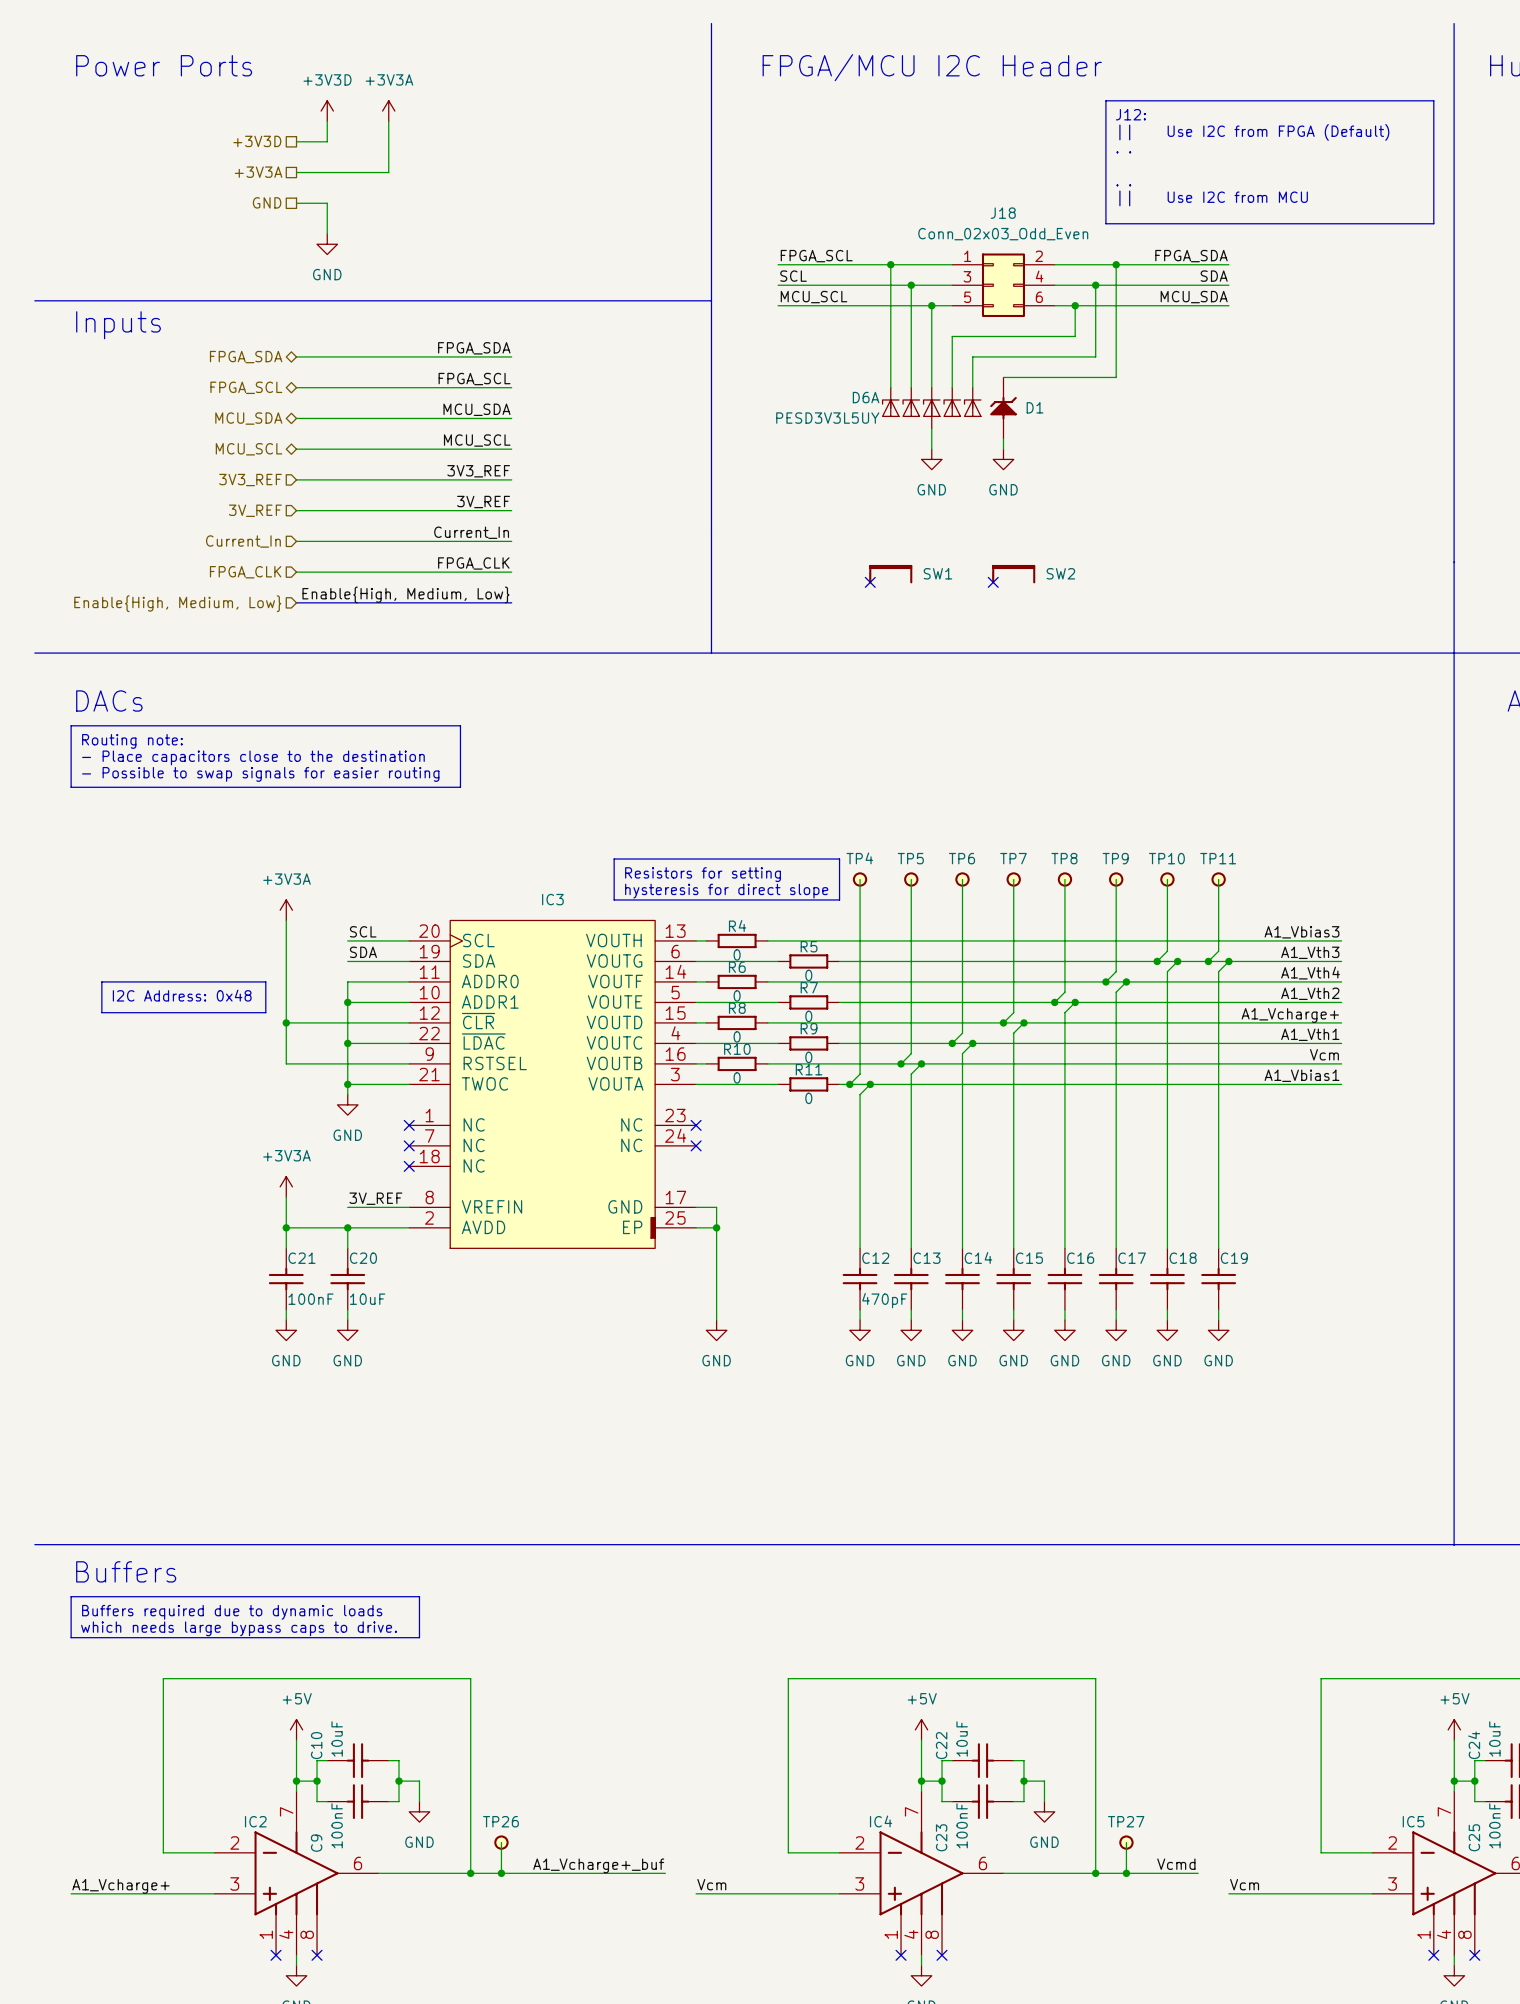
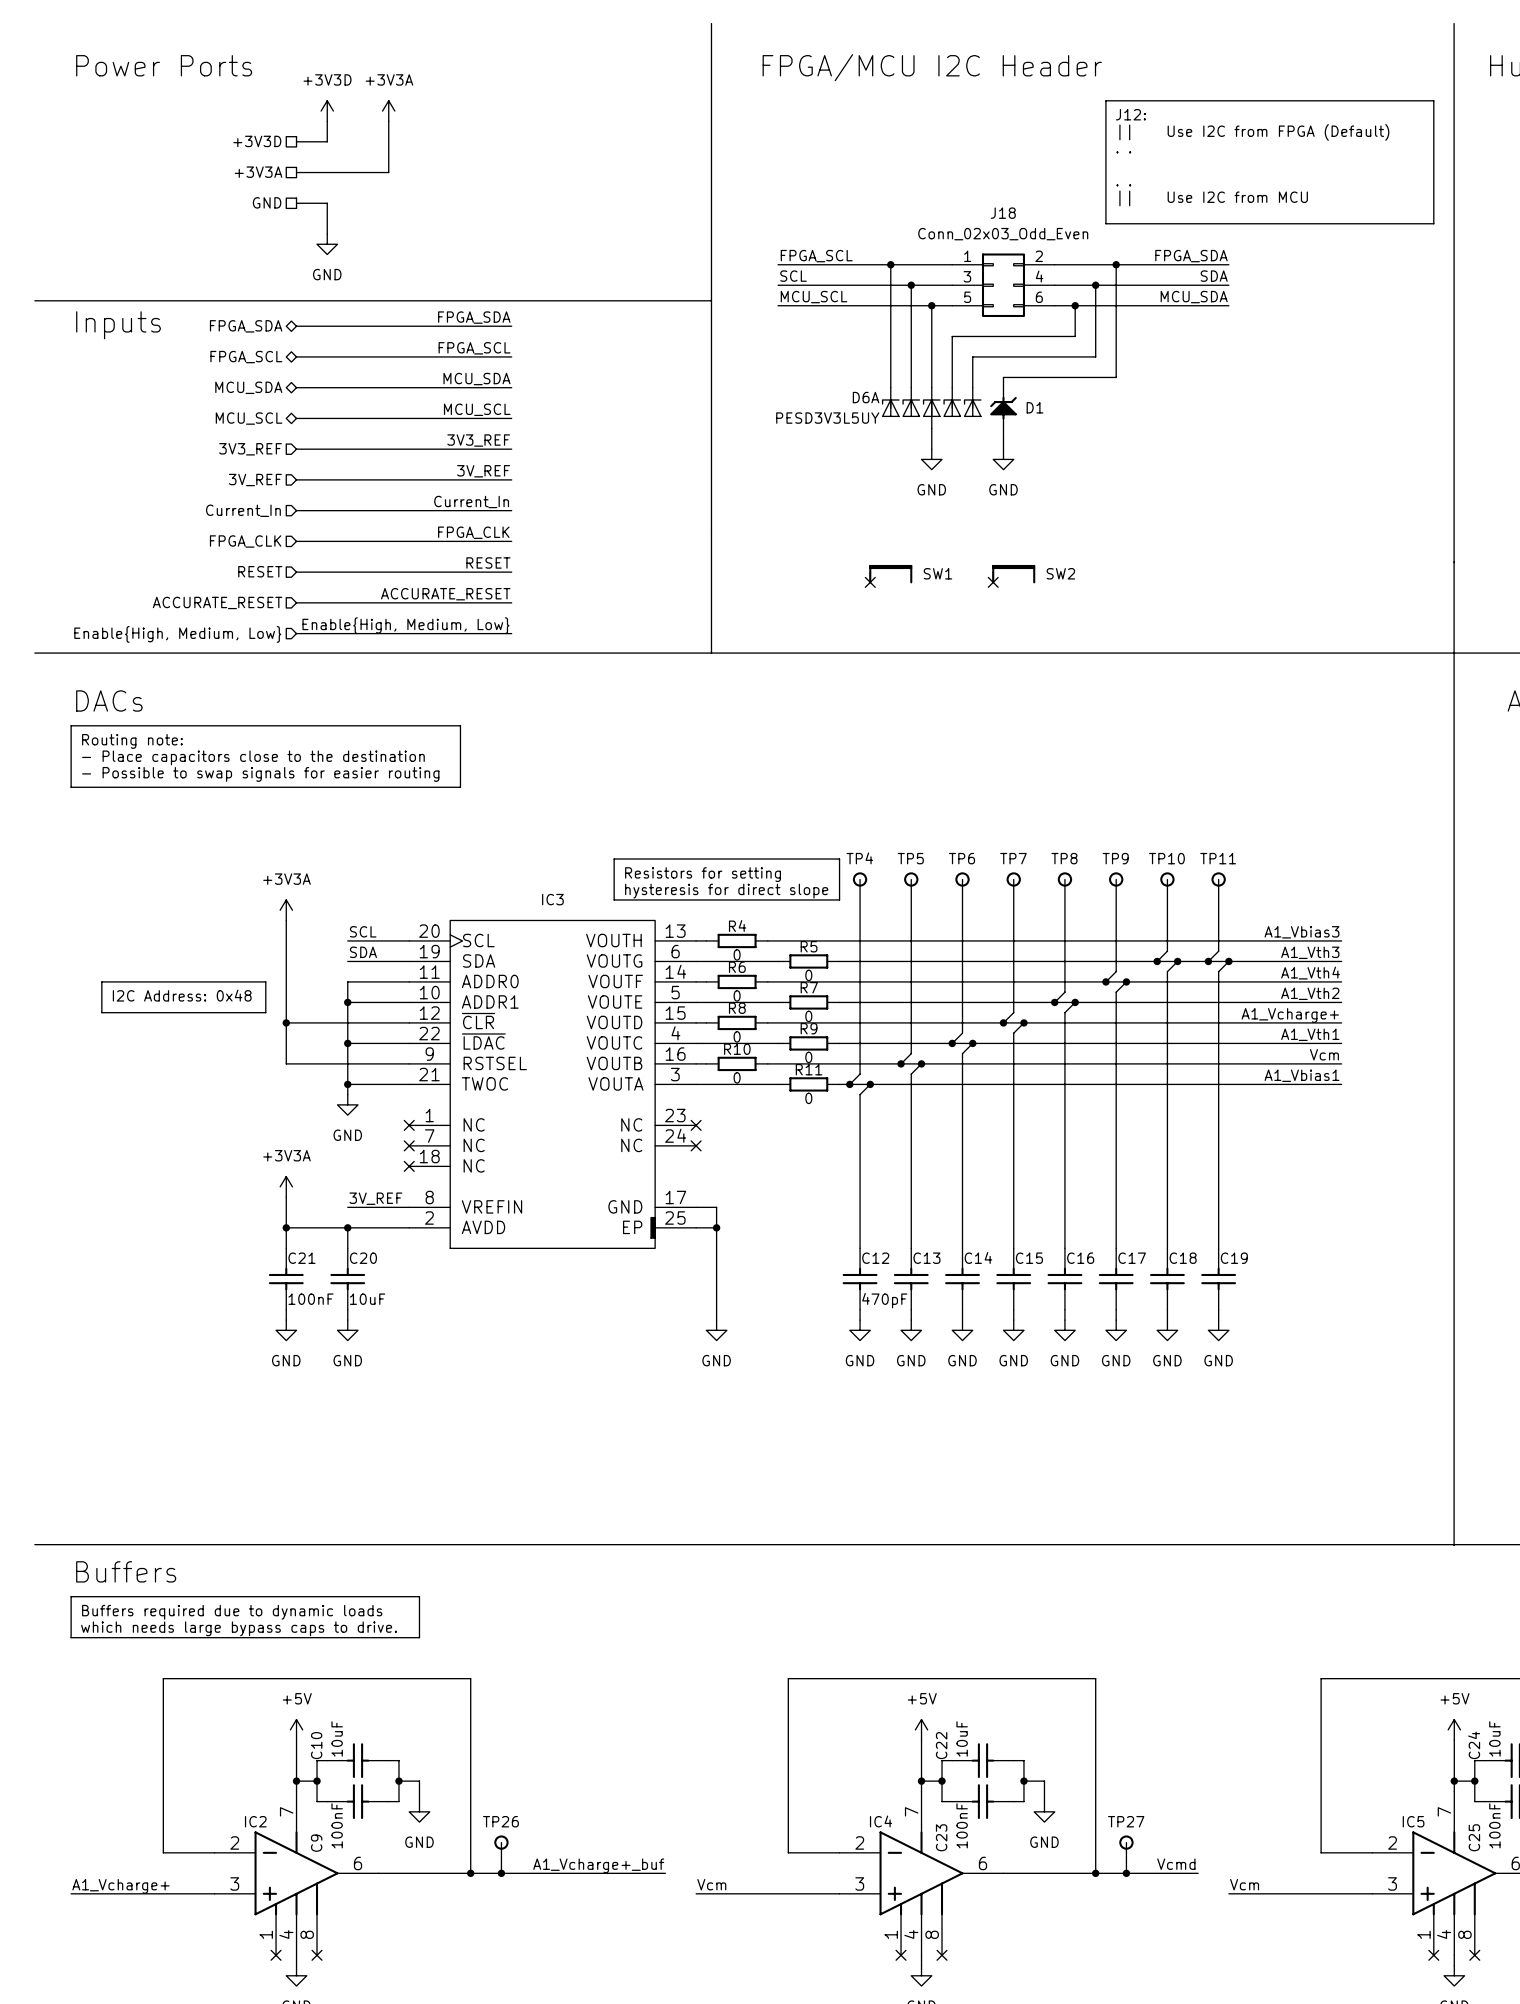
label: none -> FPGA_SDA (474, 317)
hierarchical label: none -> FPGA_SDA (246, 326)
wire: none -> (296, 326) (511, 326)
label: FPGA_SDA (474, 348) -> FPGA_SCL (474, 348)
hierarchical label: FPGA_SDA (246, 357) -> FPGA_SCL (246, 357)
label: FPGA_SCL (474, 379) -> MCU_SDA (476, 379)
hierarchical label: FPGA_SCL (246, 387) -> MCU_SDA (248, 387)
label: MCU_SDA (476, 409) -> MCU_SCL (477, 409)
hierarchical label: MCU_SDA (248, 418) -> MCU_SCL (249, 418)
label: MCU_SCL (477, 440) -> 3V3_REF (478, 440)
hierarchical label shape: bidirectional (249, 449) -> input (250, 449)
hierarchical label: MCU_SCL (249, 449) -> 3V3_REF (250, 449)
label: 3V3_REF (478, 471) -> 3V_REF (483, 471)
hierarchical label: 3V3_REF (250, 480) -> 3V_REF (255, 480)
label: 3V_REF (483, 501) -> Current_In (471, 501)
hierarchical label: 3V_REF (255, 510) -> Current_In (243, 510)
label: Current_In (471, 532) -> FPGA_CLK (473, 532)
hierarchical label: Current_In (243, 541) -> FPGA_CLK (245, 541)
label: FPGA_CLK (473, 563) -> RESET (488, 562)
hierarchical label: FPGA_CLK (245, 572) -> RESET (260, 571)
label: Enable{High, Medium, Low} (405, 594) -> ACCURATE_RESET (445, 594)
bus: (296, 602) (511, 602) -> (296, 633) (511, 633)
hierarchical label: Enable{High, Medium, Low} (177, 603) -> ACCURATE_RESET (217, 602)
label: none -> Enable{High, Medium, Low} (405, 625)
hierarchical label: none -> Enable{High, Medium, Low} (177, 634)

